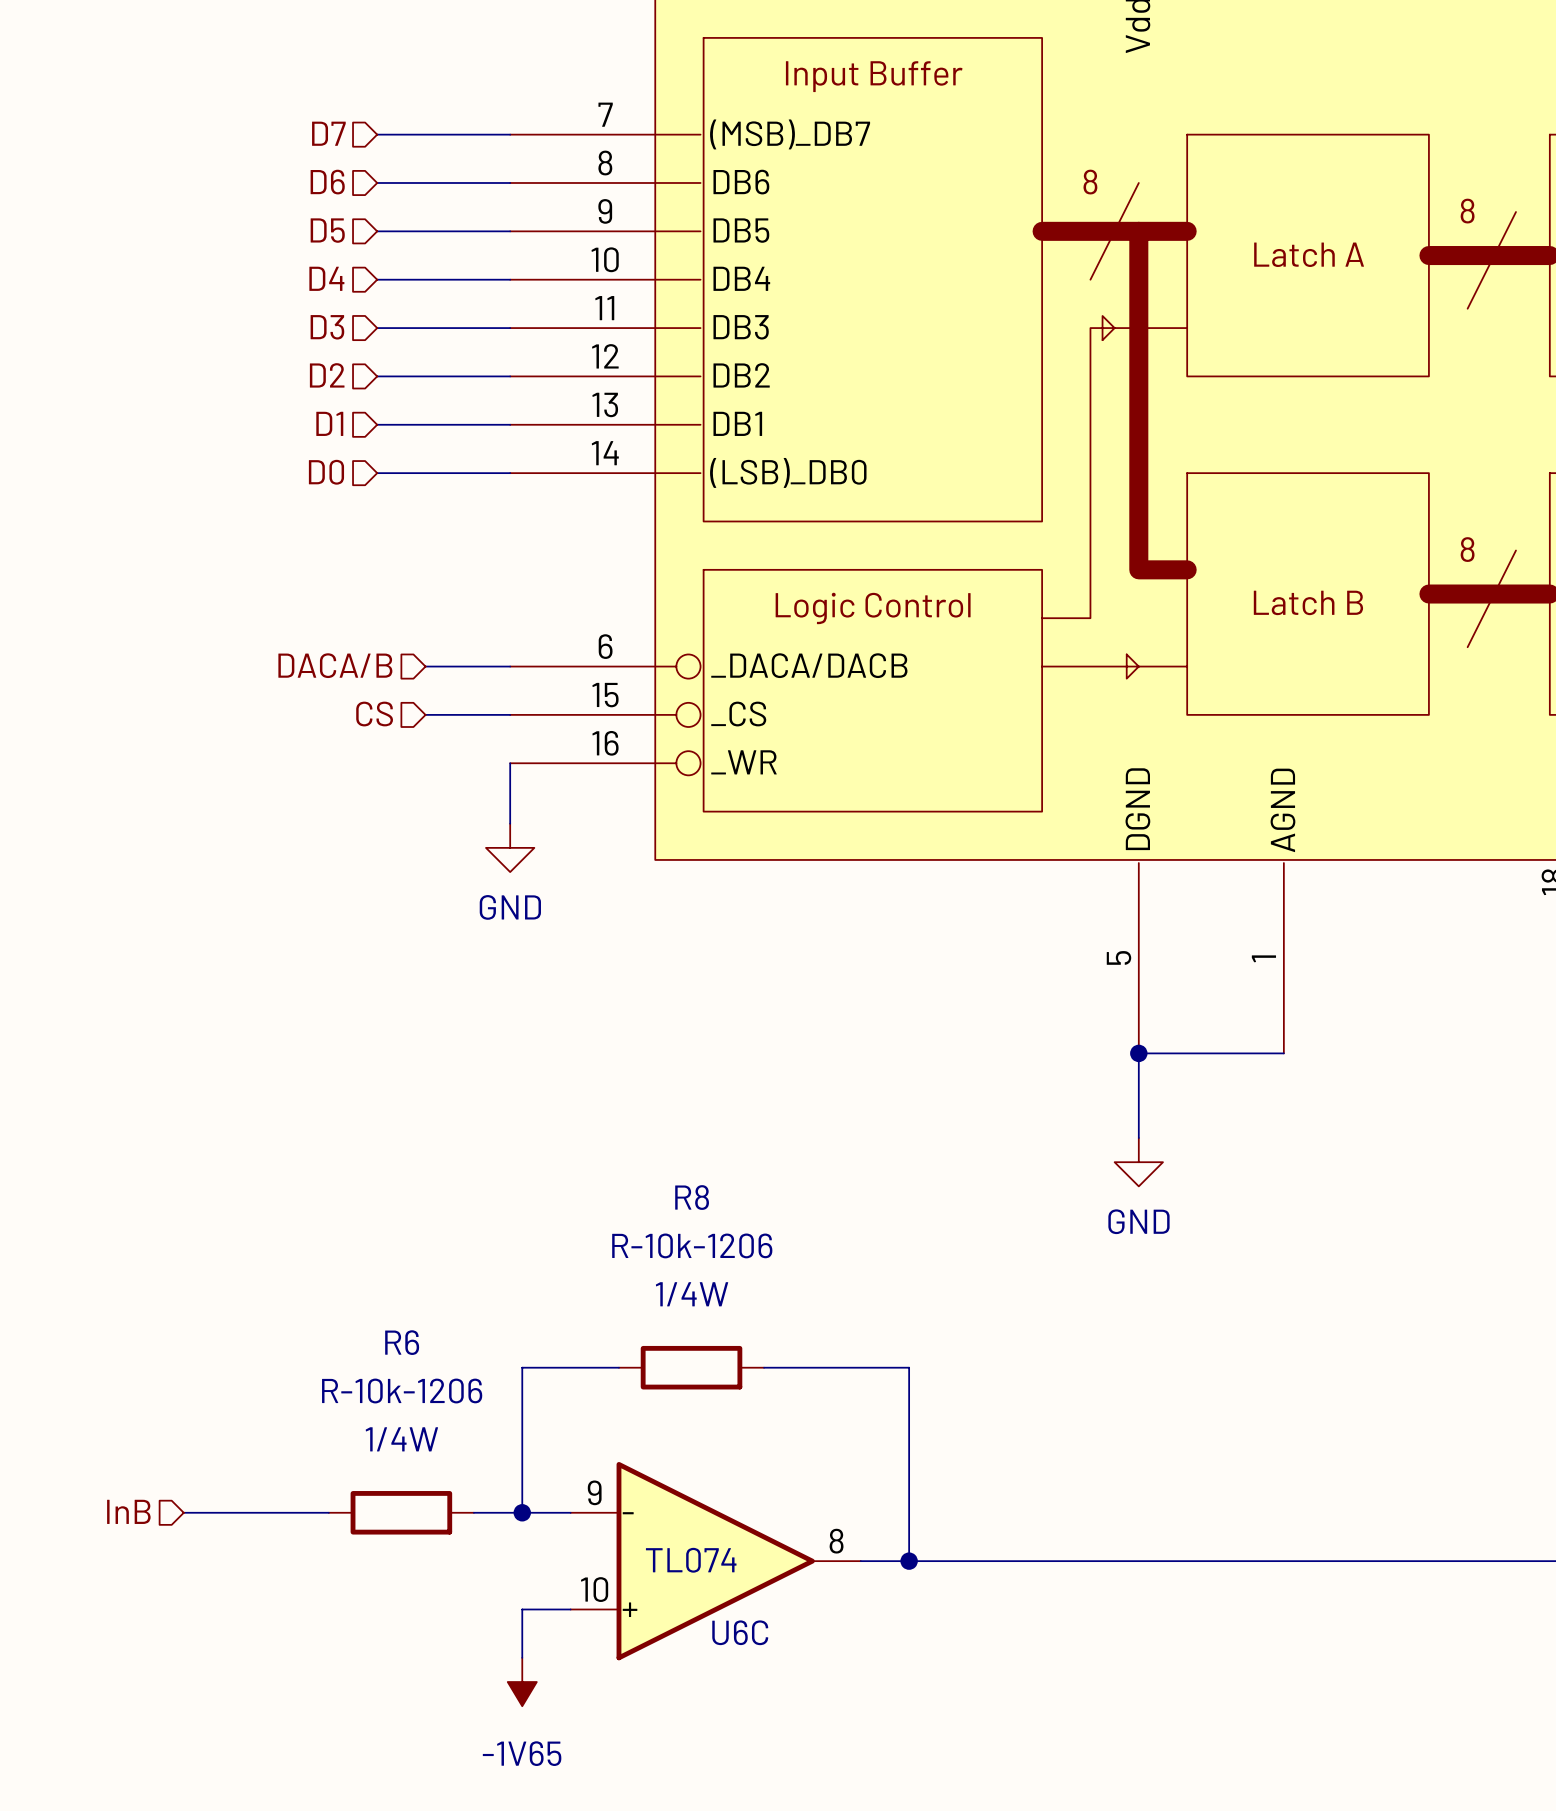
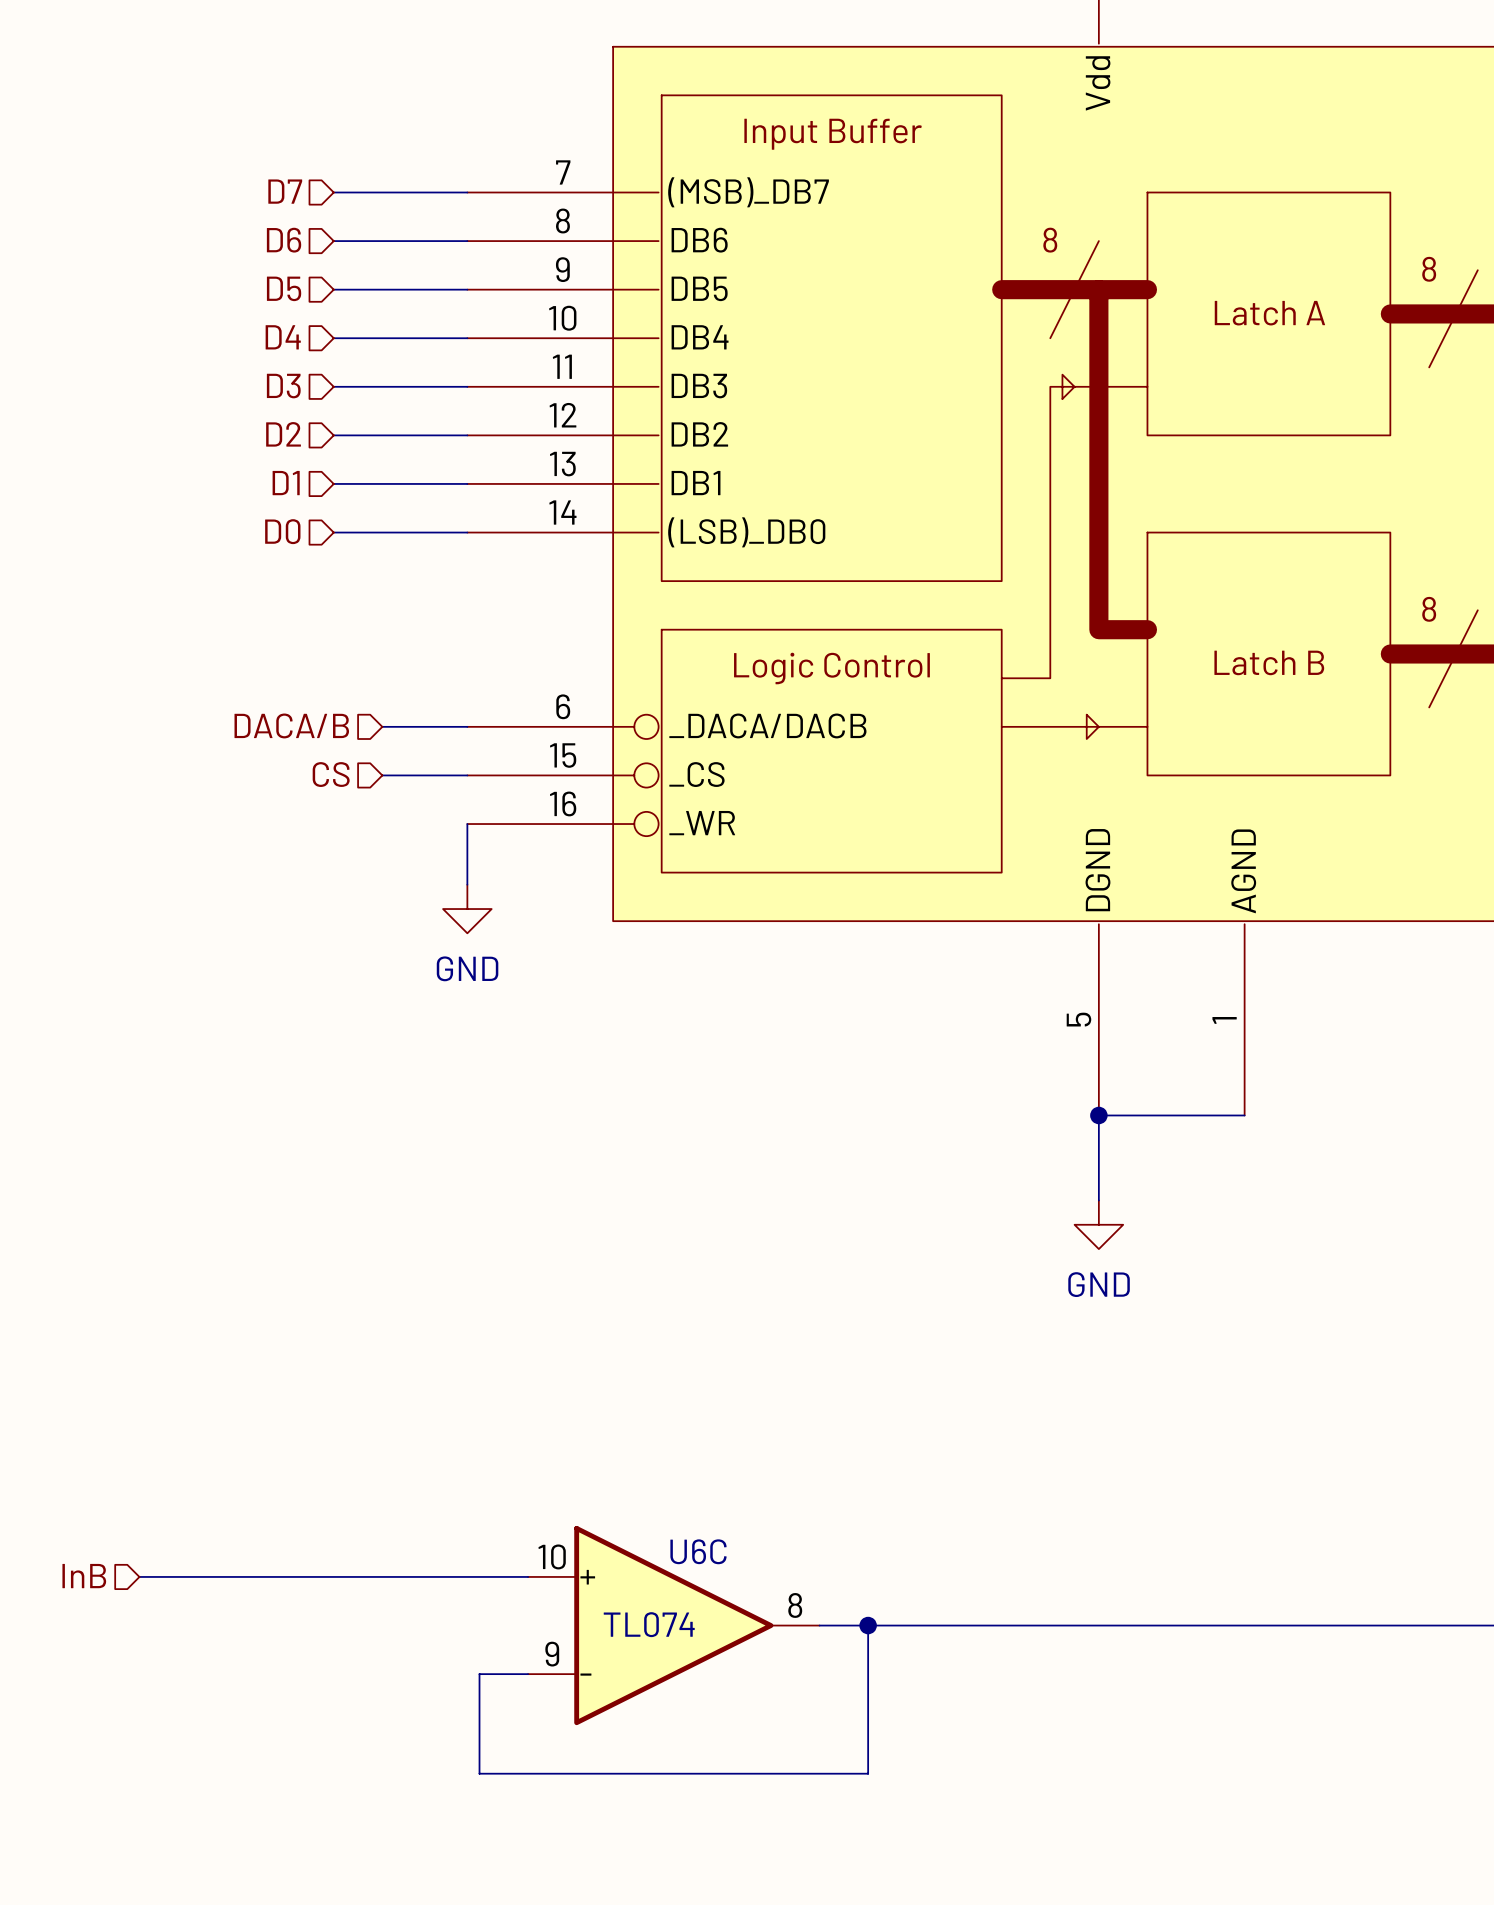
wire: (618, 1367) (522, 1367) (522, 1512) -> none
R8: R-10k-1206 (691, 1367) -> none
wire: (764, 1367) (909, 1367) (909, 1561) -> (479, 1722) (479, 1773) (868, 1773) (868, 1625)
wire: none -> (285, 1576) (430, 1576)
R6: R-10k-1206 (401, 1512) -> none
junction: (522, 1512) -> none
U6C flip: as is (715, 1561) -> up-down (673, 1625)
power symbol: -1V65 (522, 1682) -> none

